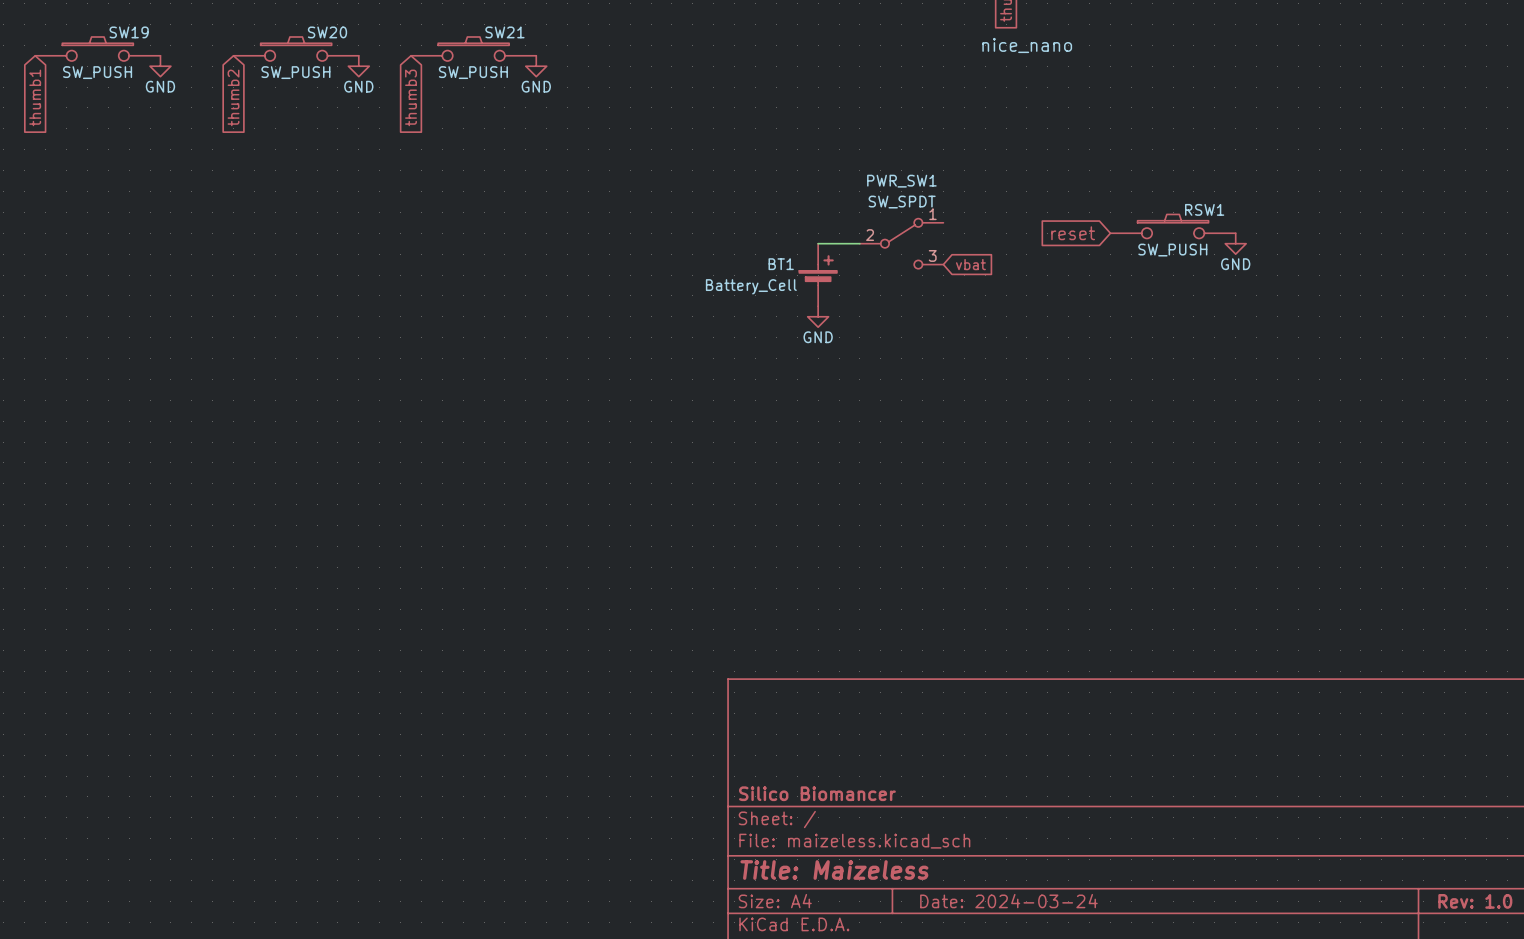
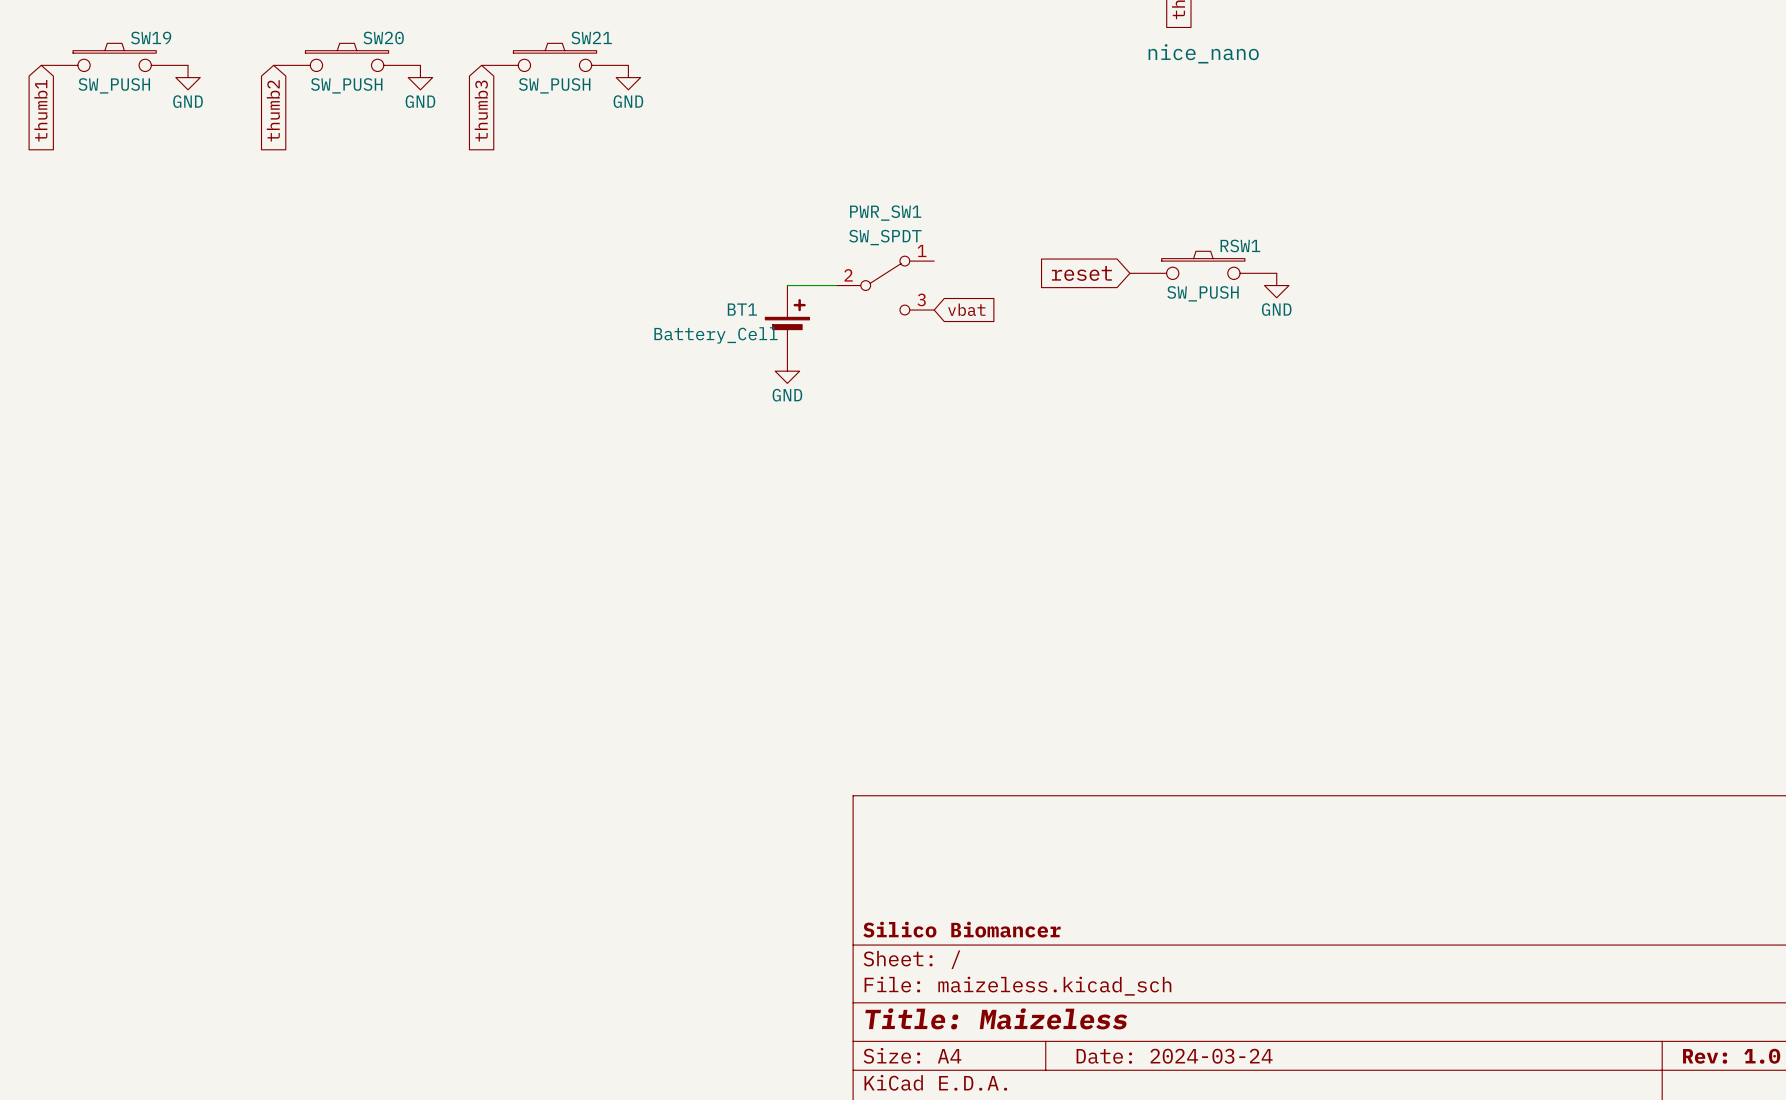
RSW1 position: (1173, 226) -> (1203, 265)
global label position: reset (1073, 233) -> reset (1081, 273)
wire: (818, 243) (859, 243) -> (787, 285) (836, 285)
PWR_SW1 position: (901, 243) -> (885, 285)
power symbol: none -> GND (1276, 285)
power symbol: GND (1235, 243) -> none
global label position: vbat (970, 264) -> vbat (966, 309)
BT1 position: (818, 275) -> (787, 322)
power symbol: none -> GND (787, 371)
power symbol: GND (818, 316) -> none

